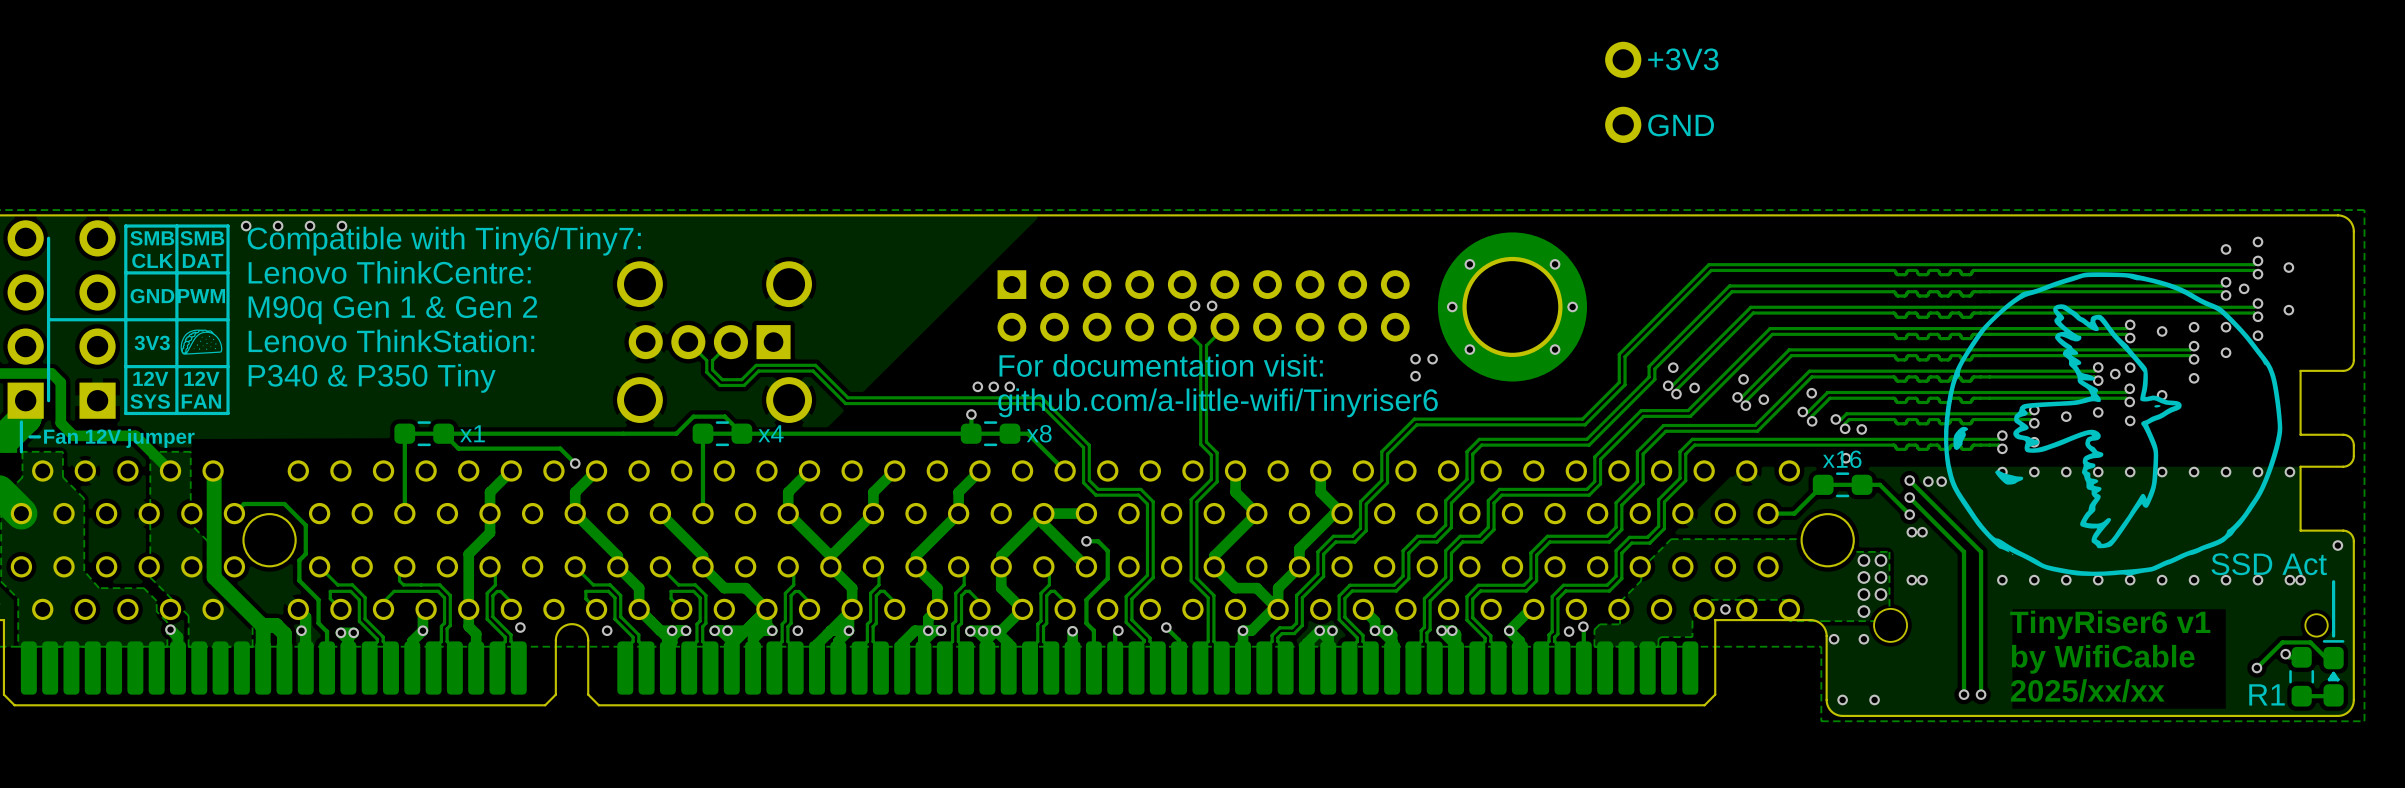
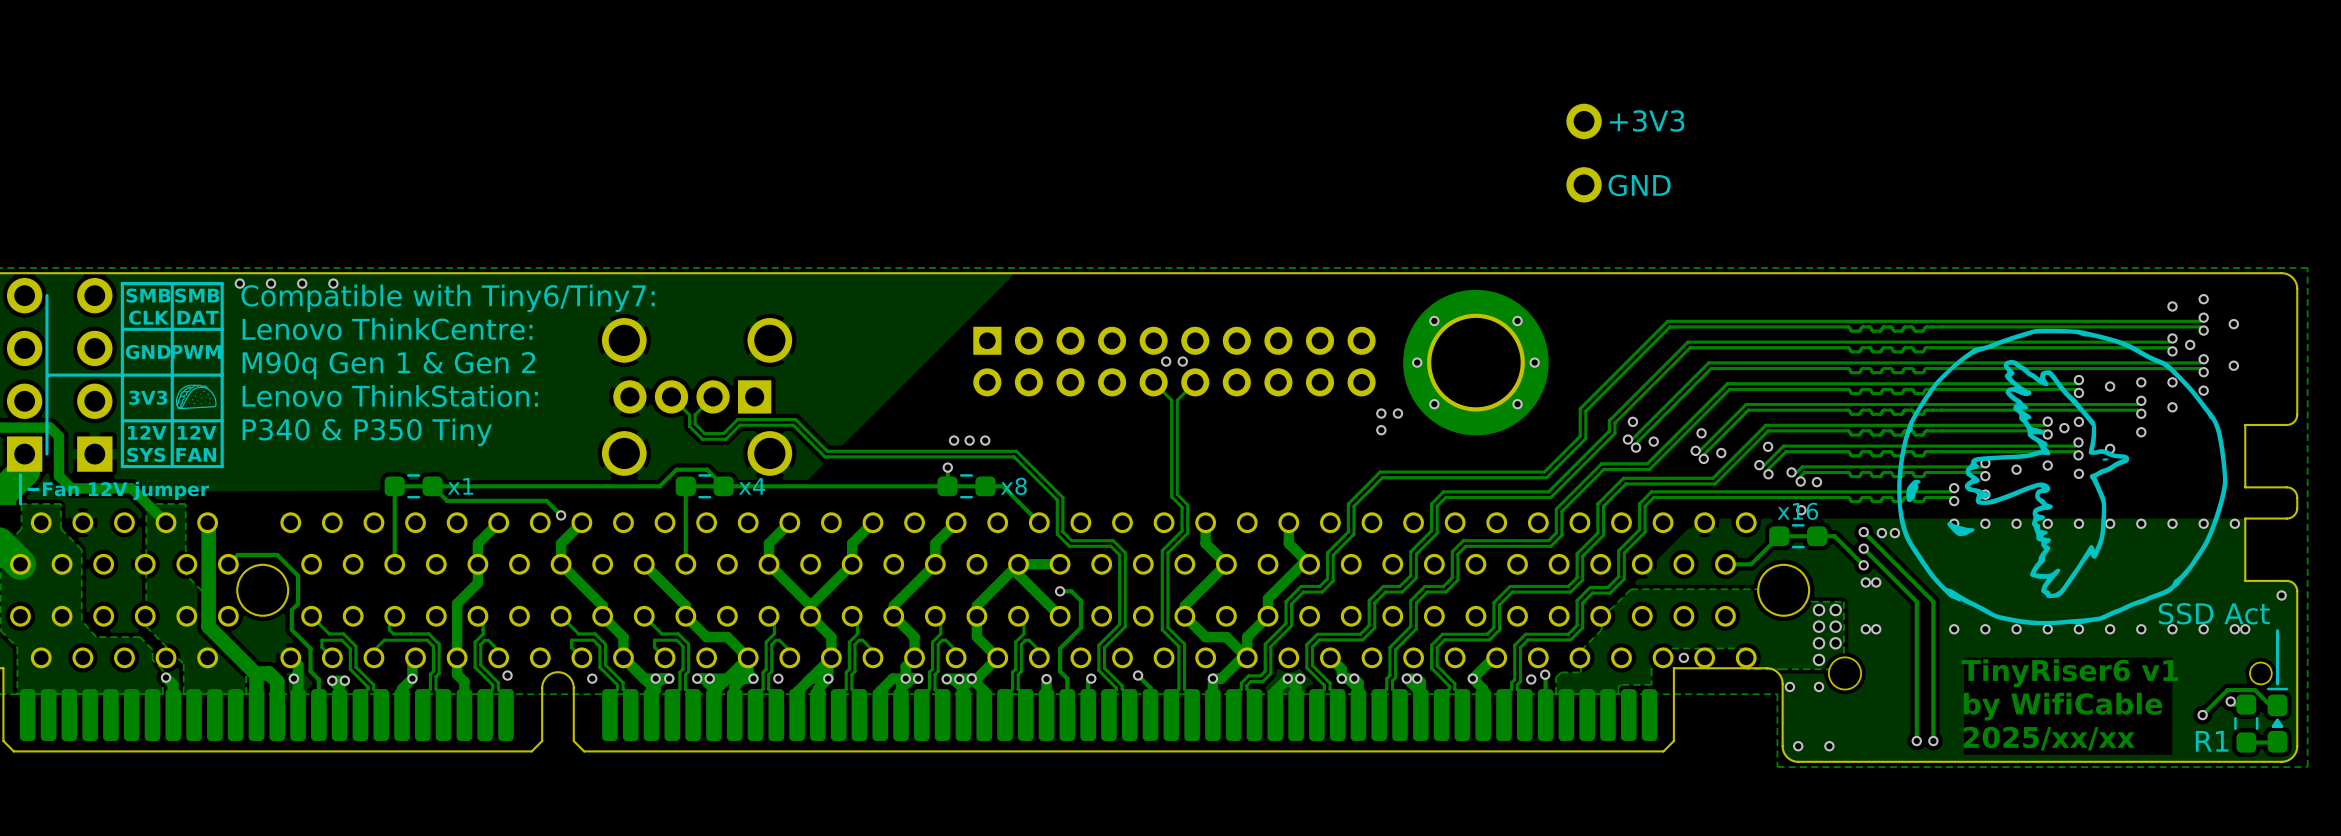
text: For documentation visit: (1161, 365) -> none
text: github.com/a-little-wifi/Tinyriser6 (1218, 402) -> none

